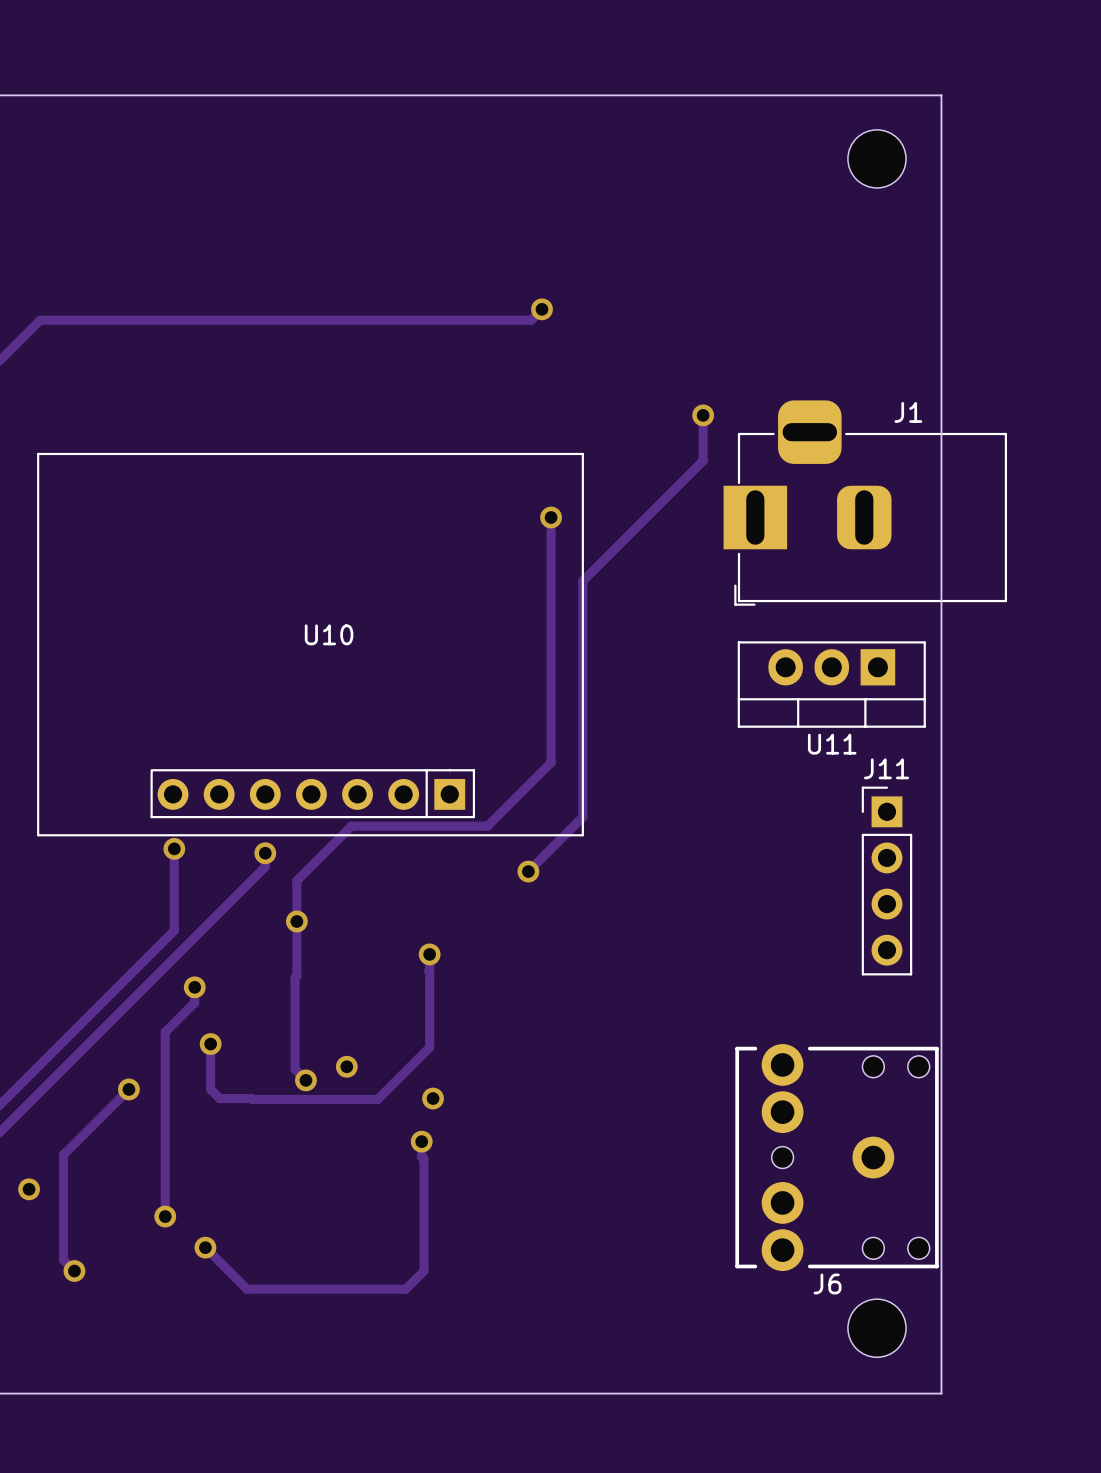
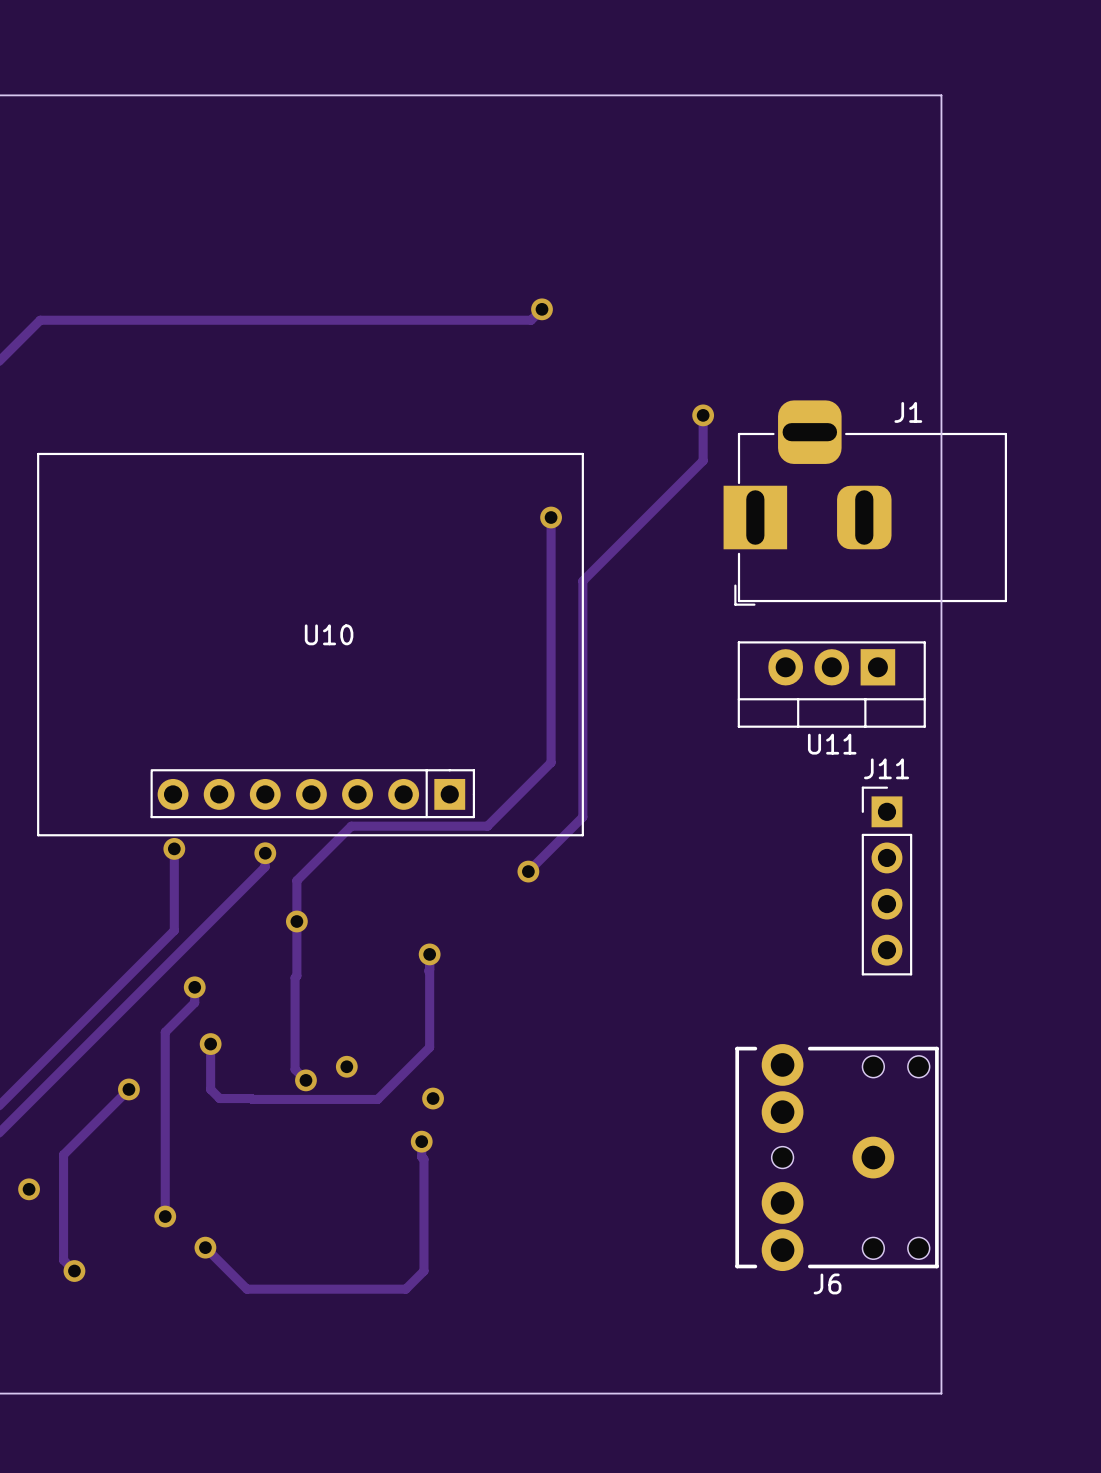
part: (877, 158) -> none
part: (877, 1328) -> none

